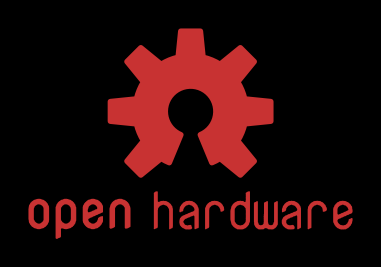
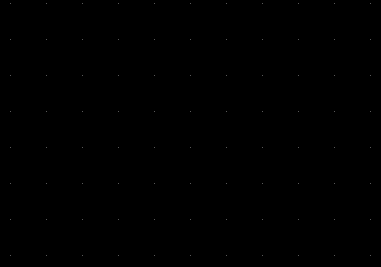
part: (190, 133) -> none

